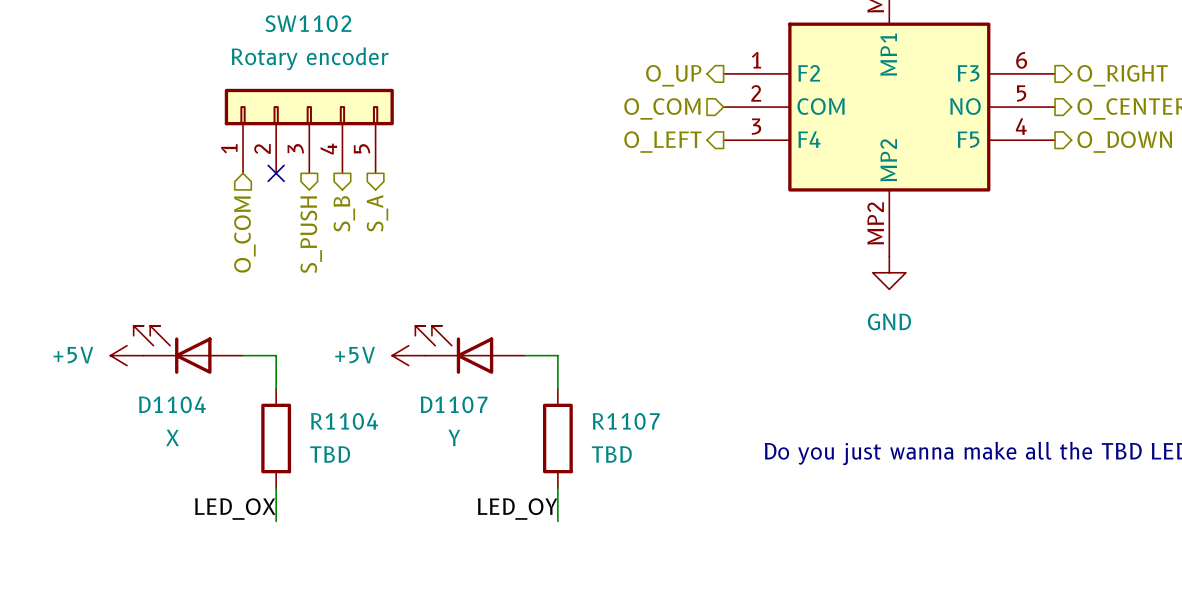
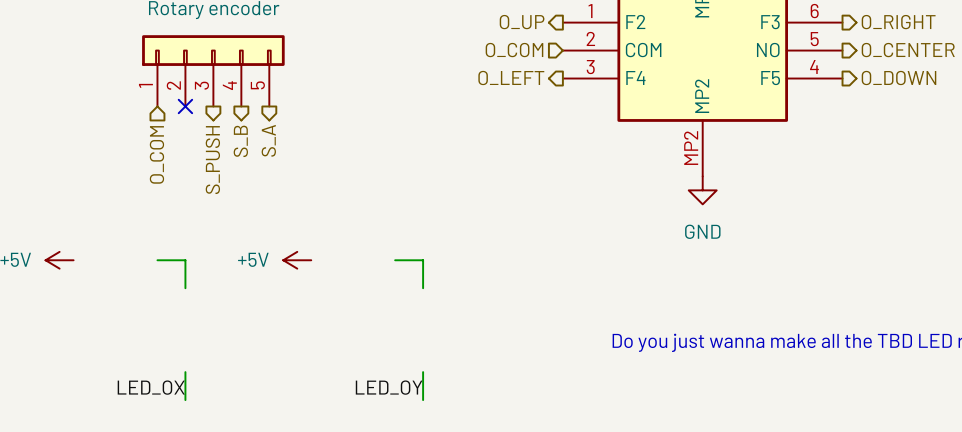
D1104: X (188, 349) -> none
D1107: Y (470, 349) -> none
R1104: TBD (276, 438) -> none
R1107: TBD (557, 438) -> none

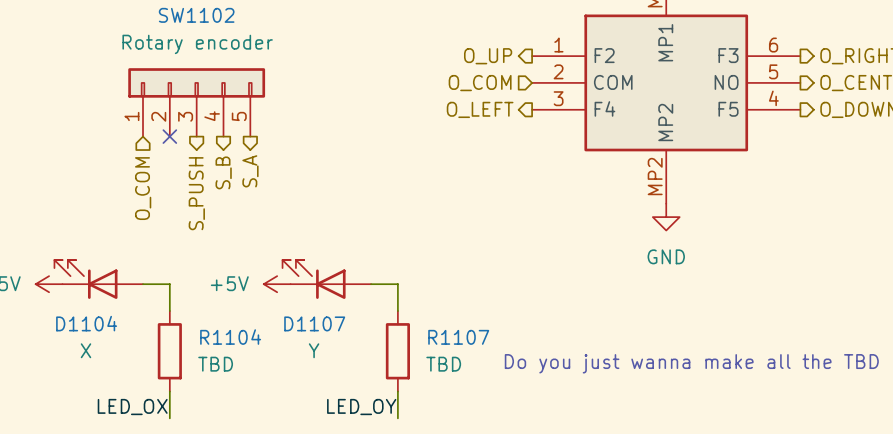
D1104: none -> X (98, 279)
D1107: none -> Y (326, 279)
R1104: none -> TBD (169, 351)
R1107: none -> TBD (397, 351)

